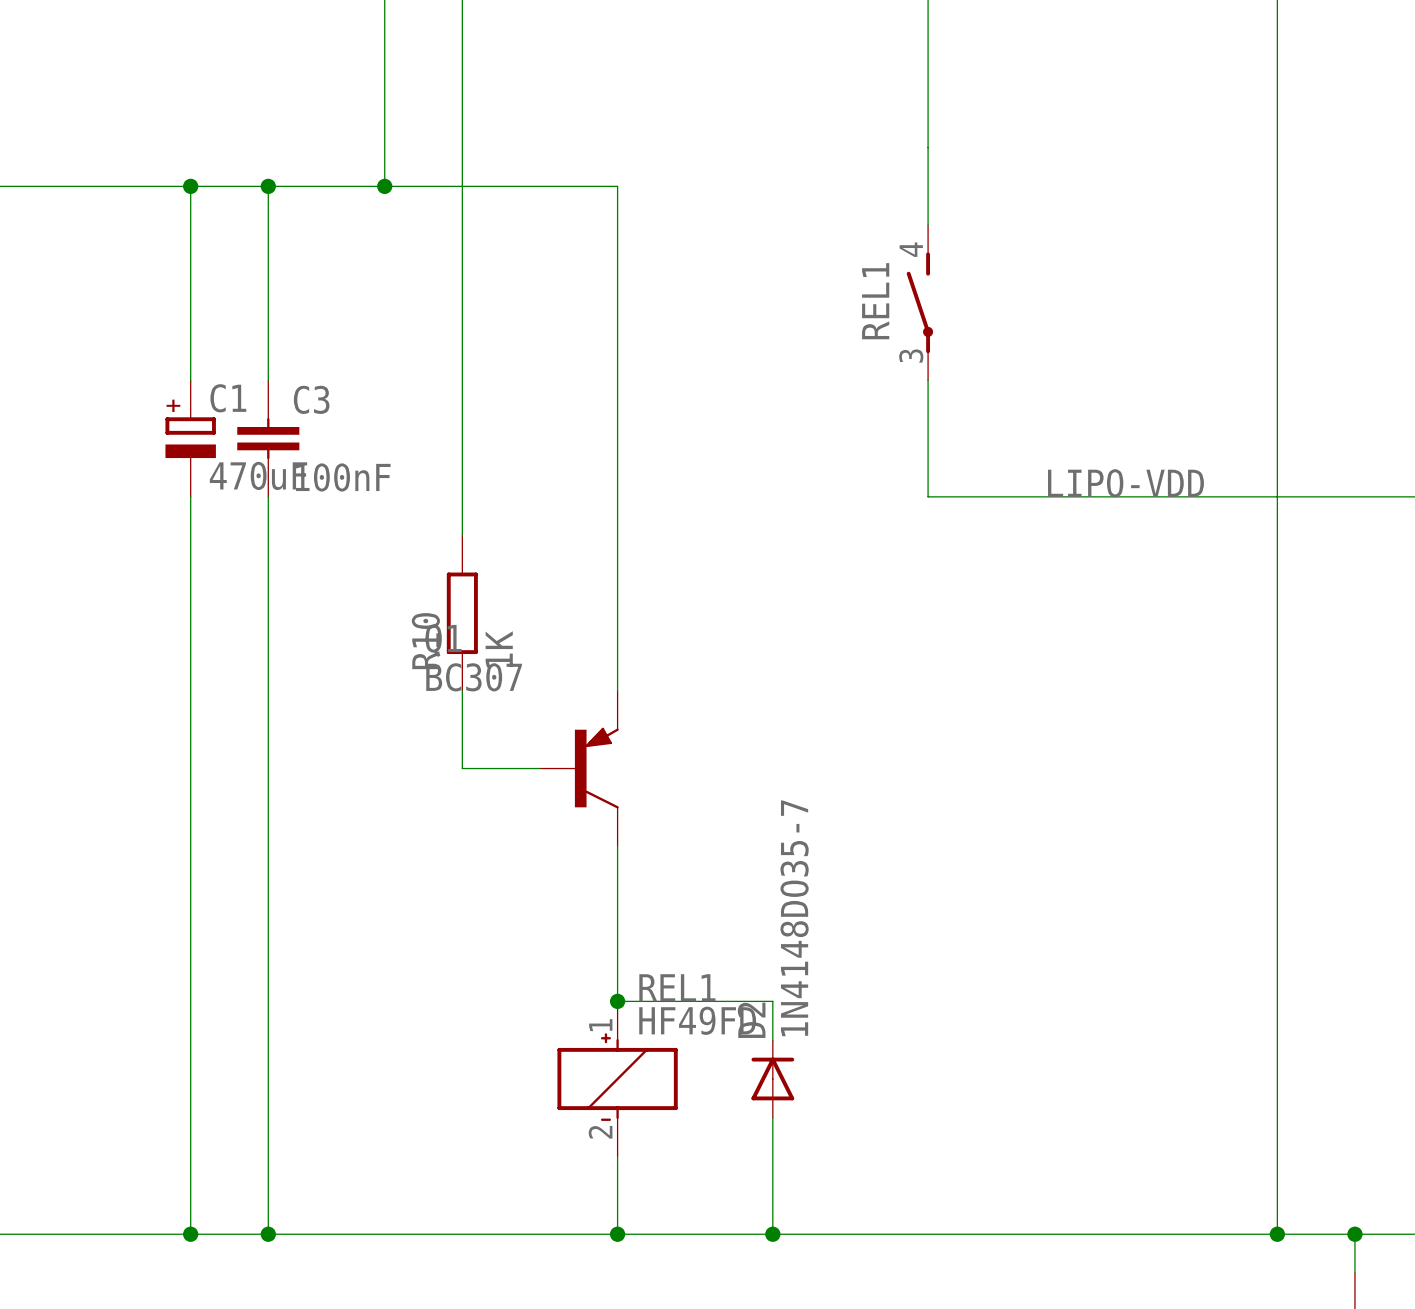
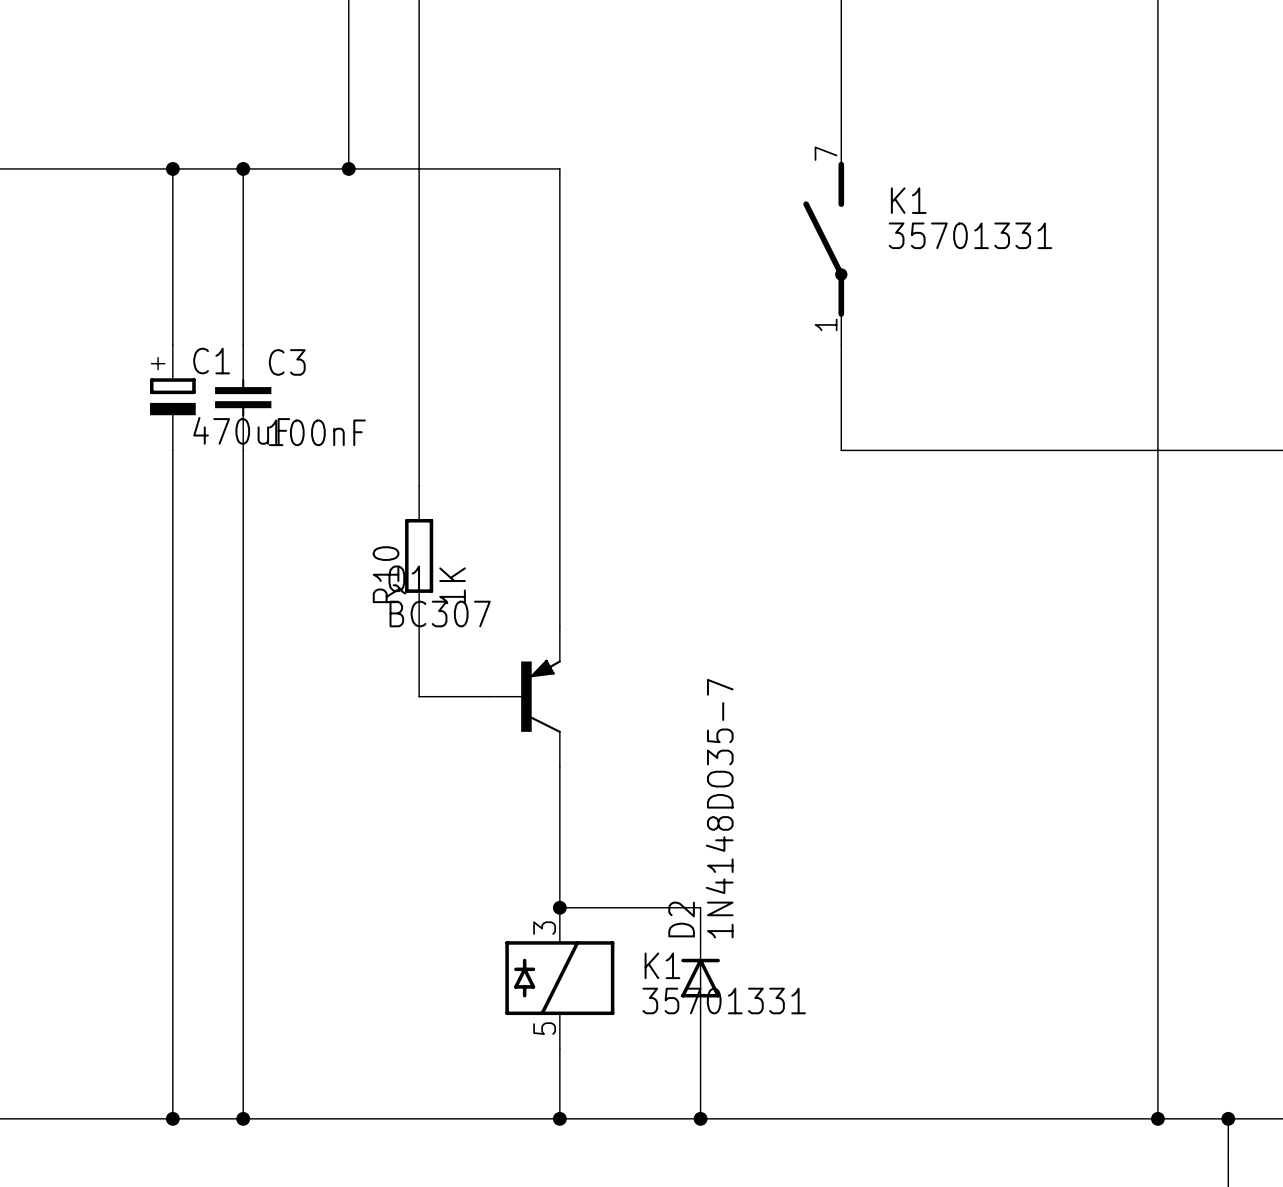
K1: none -> 35701331 (825, 239)
REL1: (919, 302) -> none
label: LIPO-VDD (1125, 483) -> none
REL1: HF49FD (617, 1079) -> none
K1: none -> 35701331 (559, 978)

